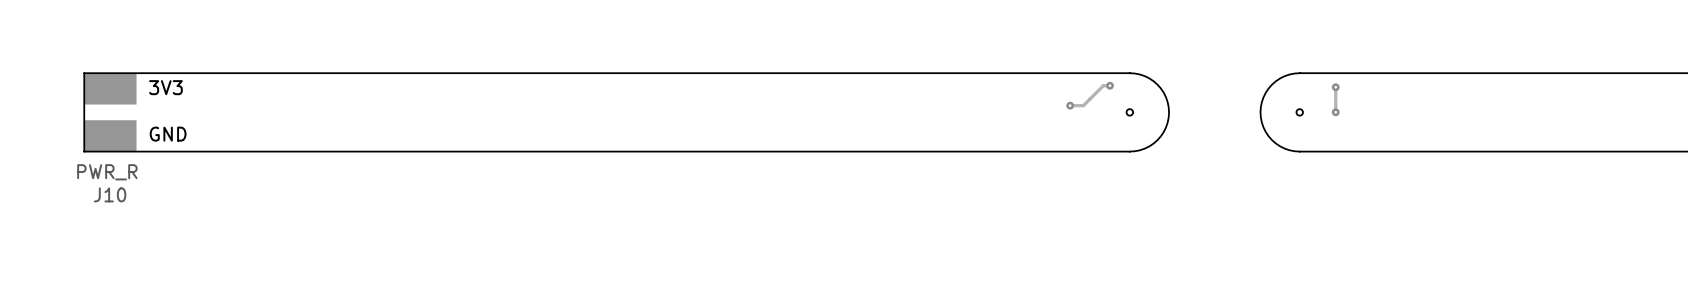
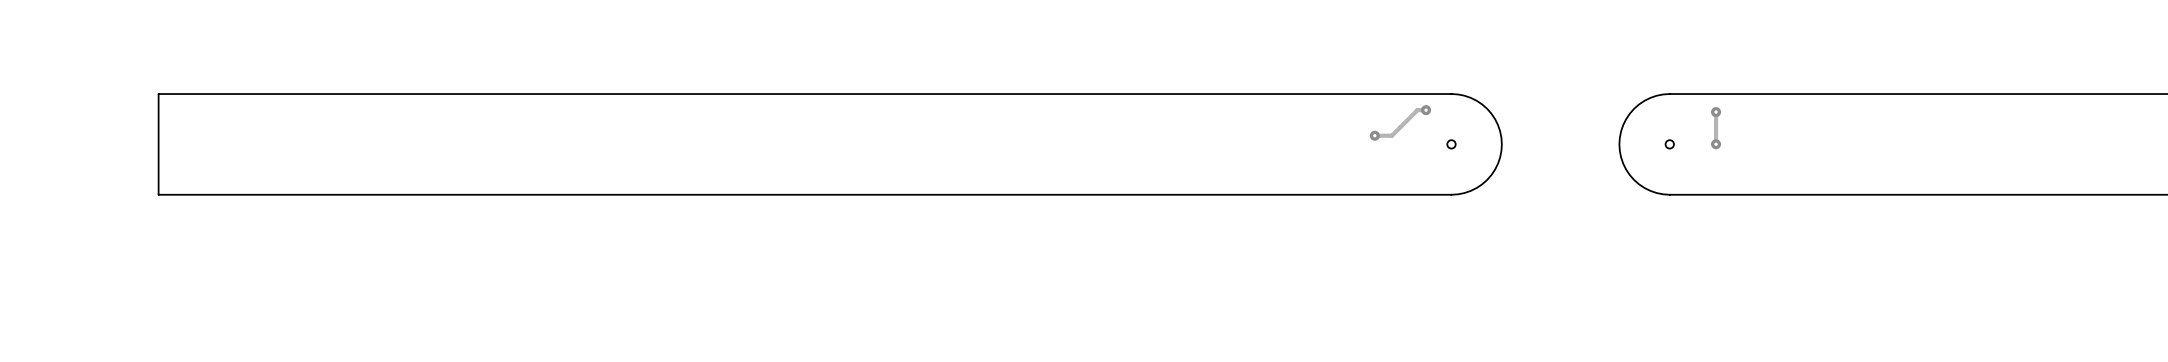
board edge: (123, 73) (84, 73) (84, 151) (123, 151) -> (158, 94) (158, 194)
J10: PWR_R (110, 112) -> none

